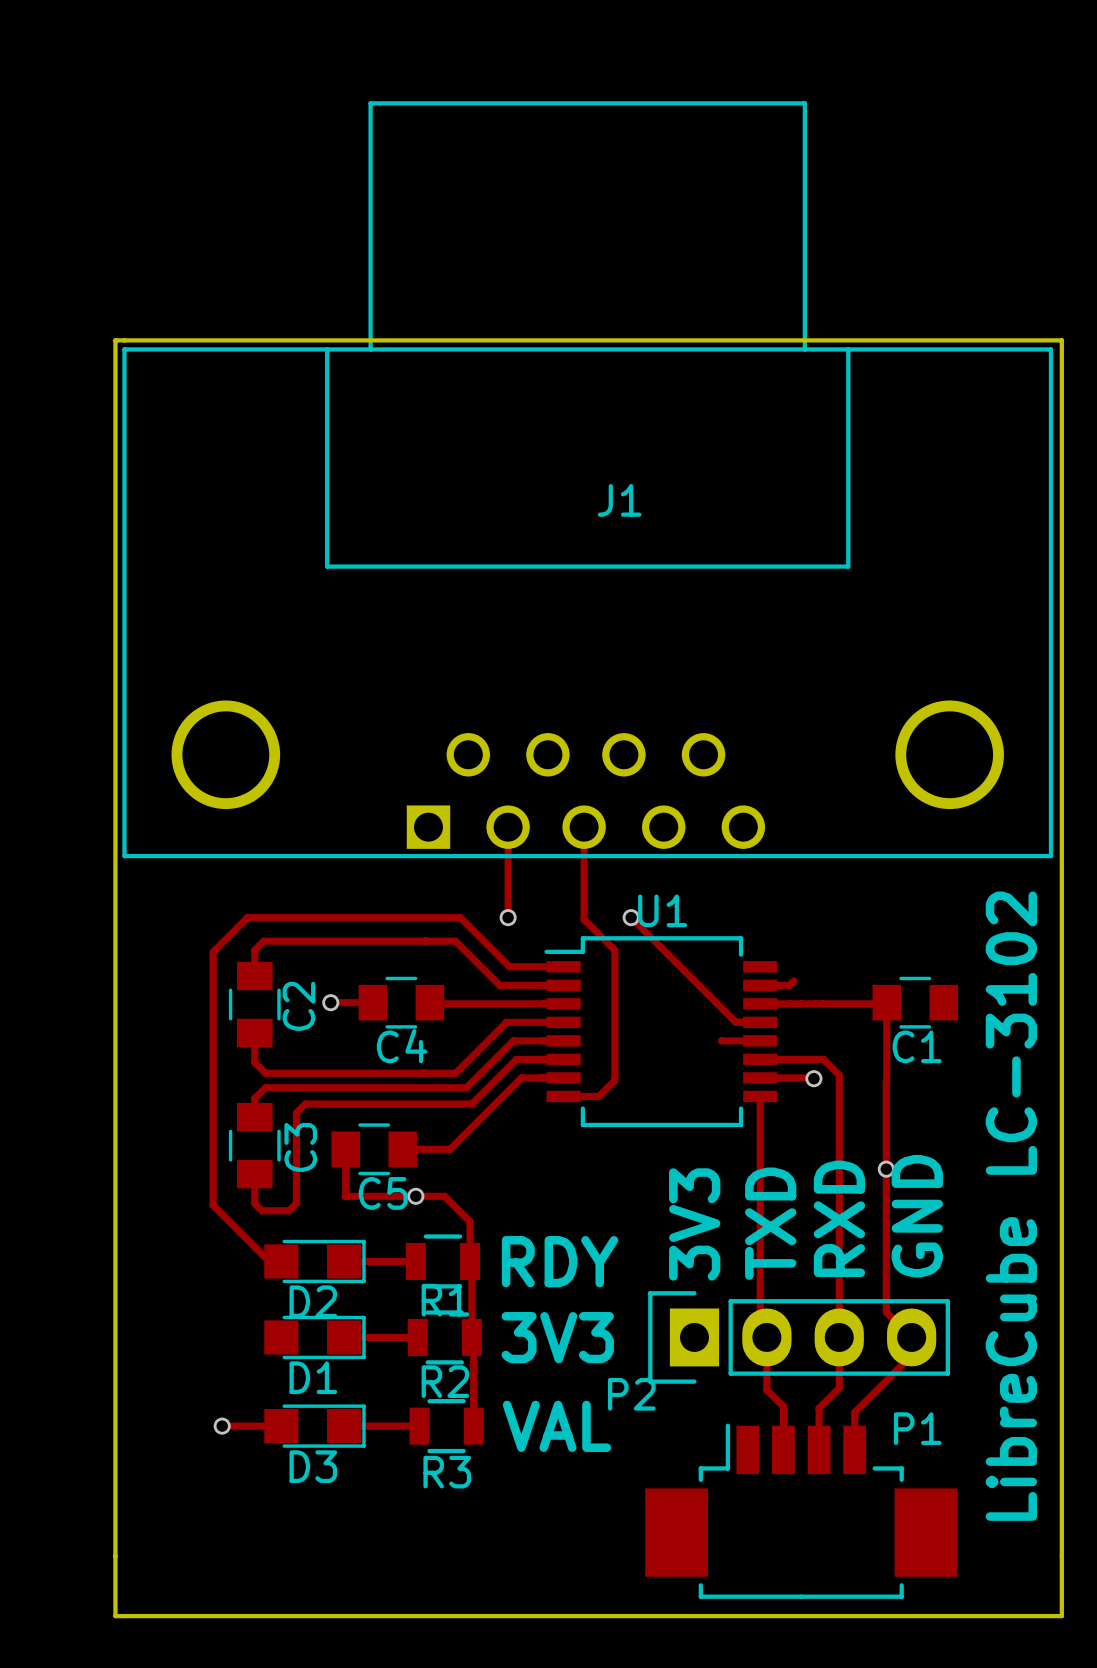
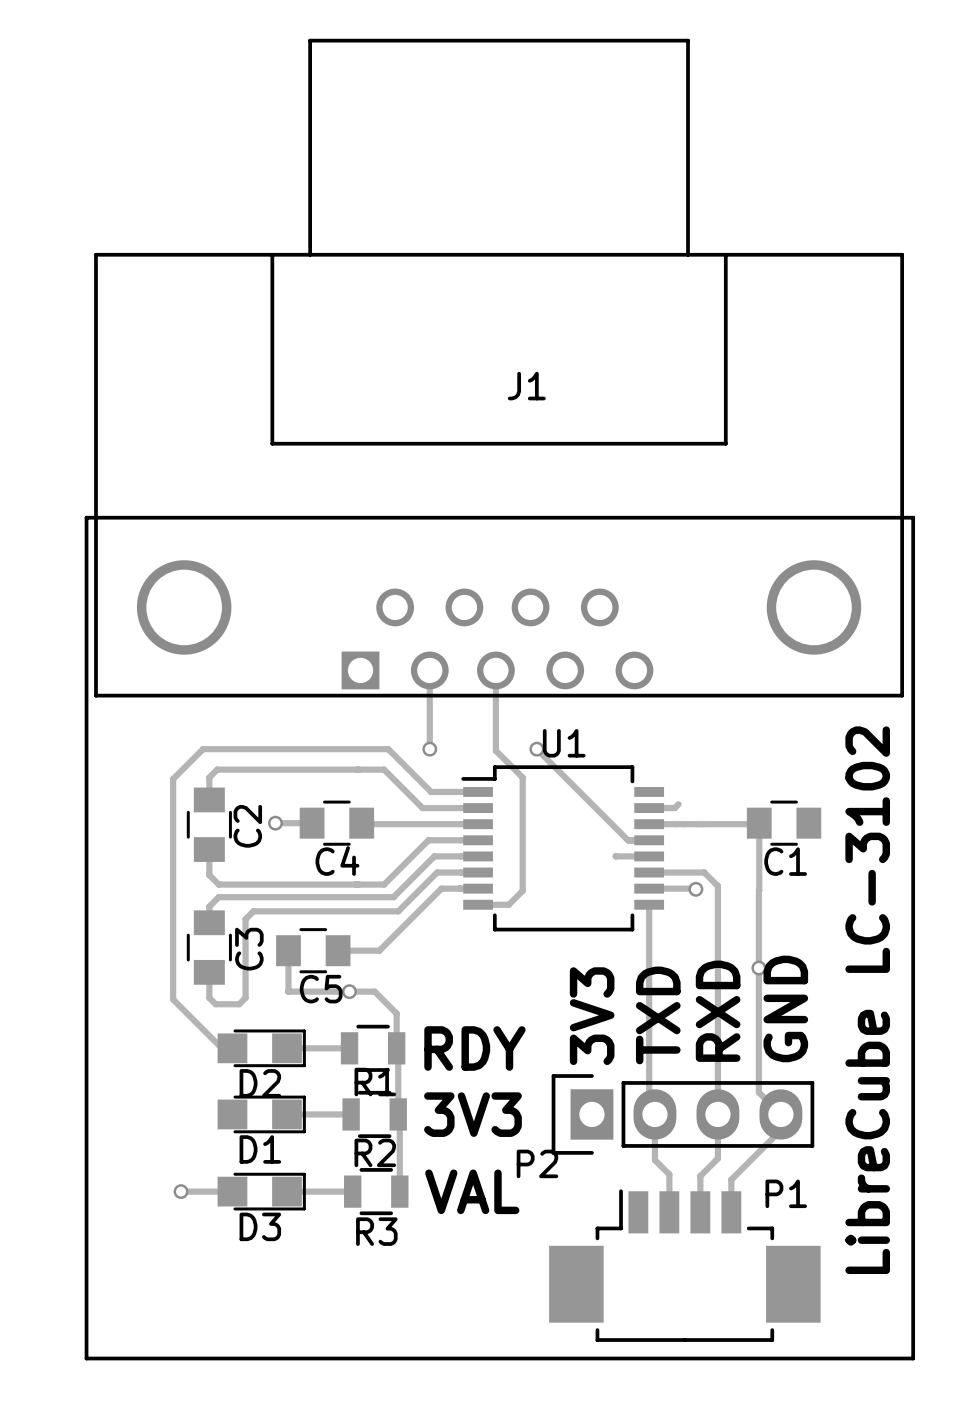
board edge: (115, 340) (115, 1616) (1061, 1616) (1061, 340) (115, 340) -> (86, 517) (86, 1358) (913, 1358) (913, 517) (86, 517)

